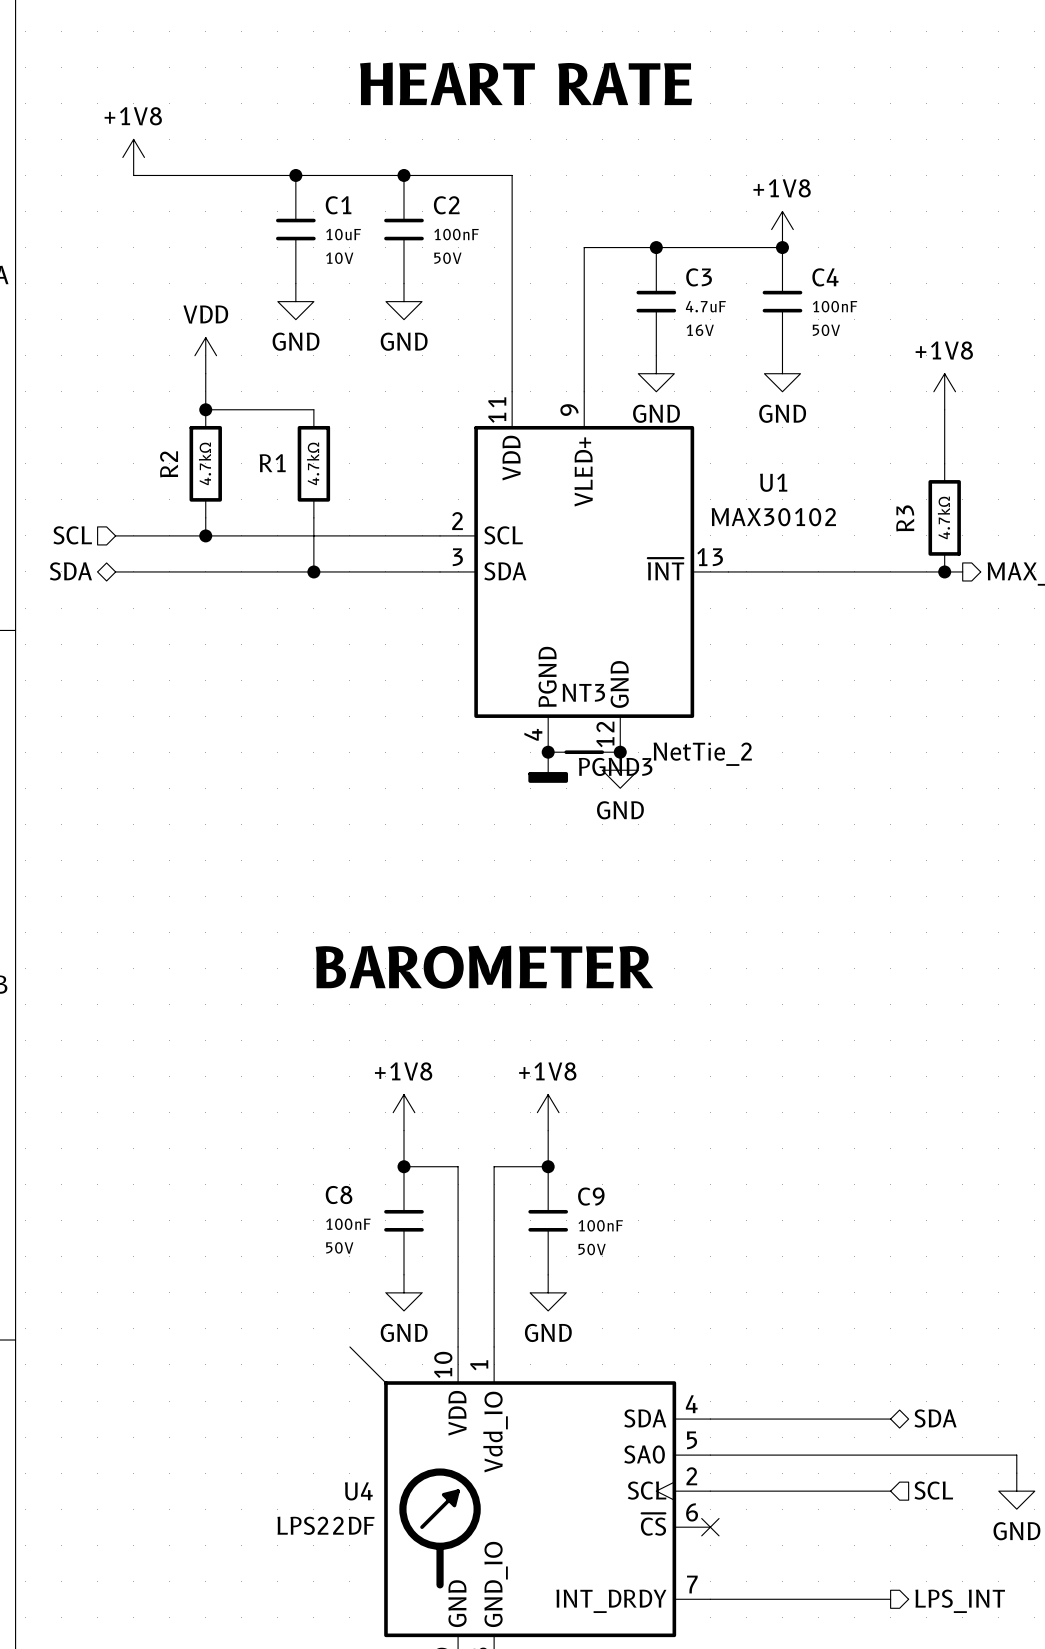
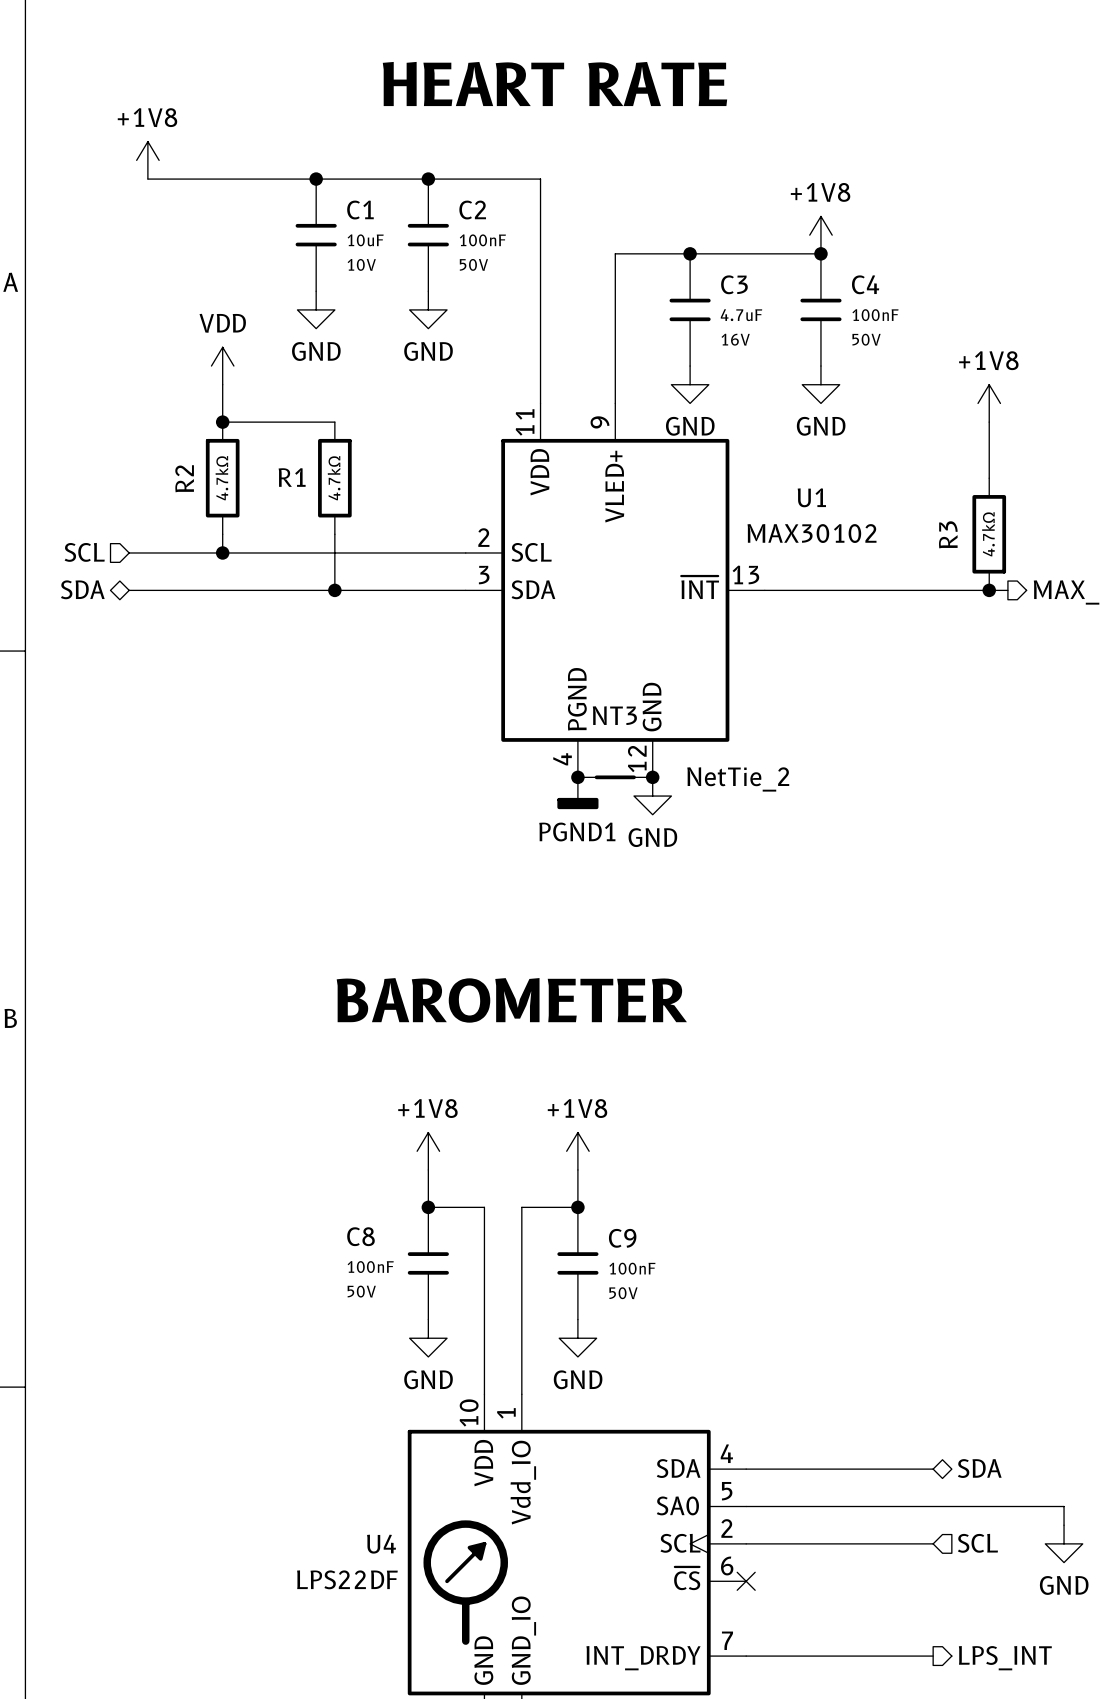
power symbol: PGND3 (548, 767) -> PGND1 (577, 793)
wire: (349, 1346) (385, 1383) -> none

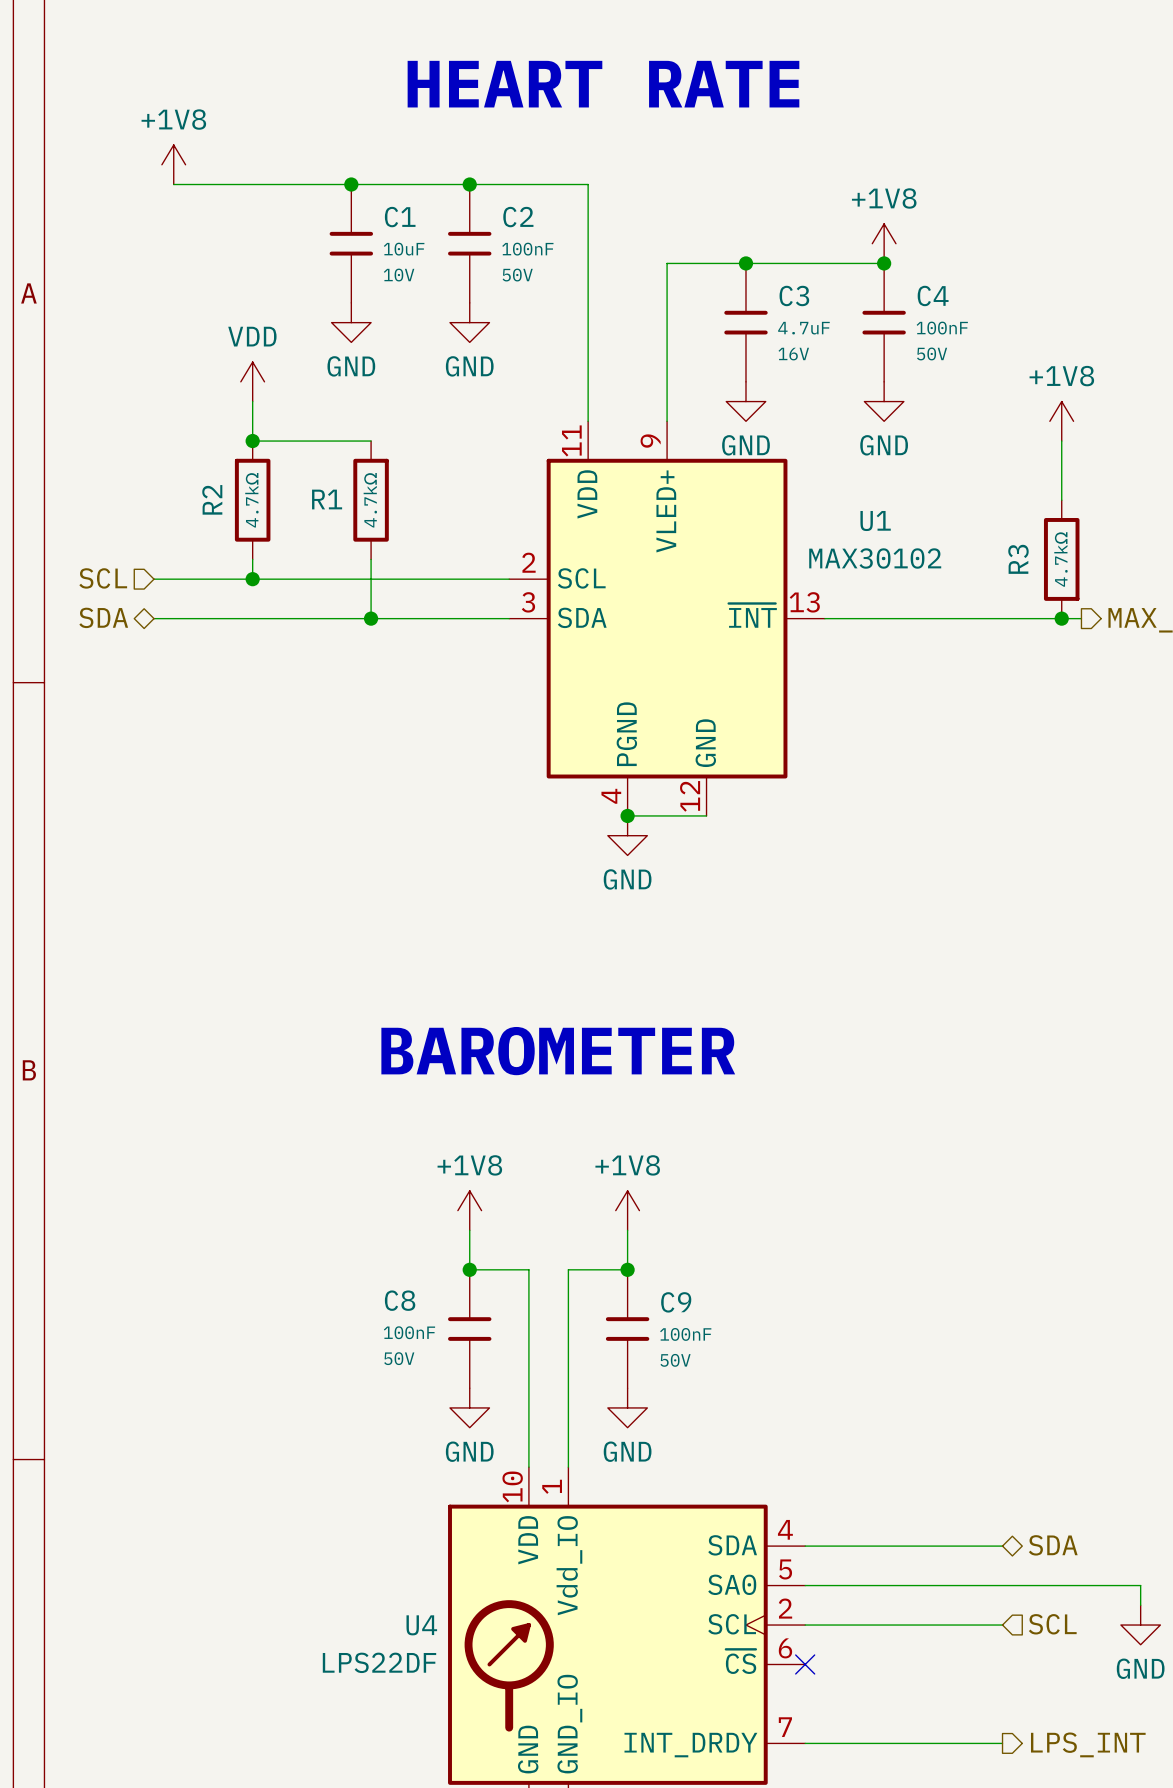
NT3: NetTie_2 (615, 777) -> none
junction: (652, 777) -> none
power symbol: PGND1 (577, 793) -> GND (627, 835)
power symbol: GND (652, 796) -> none

